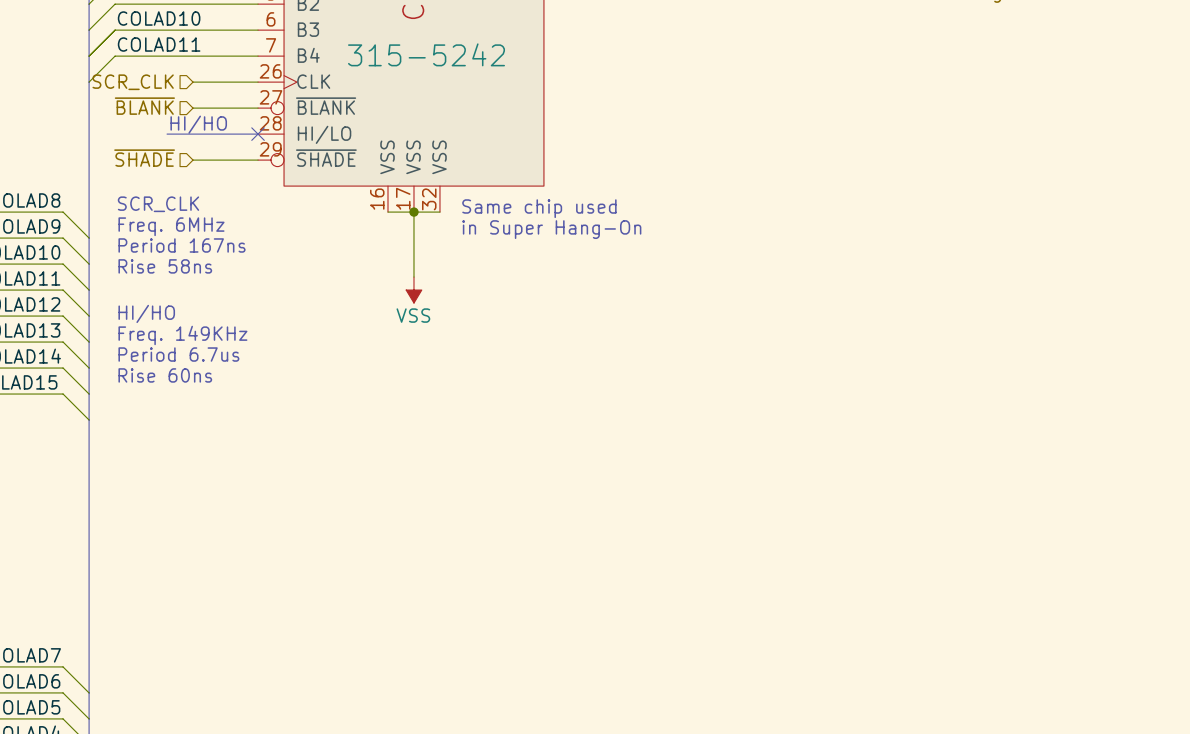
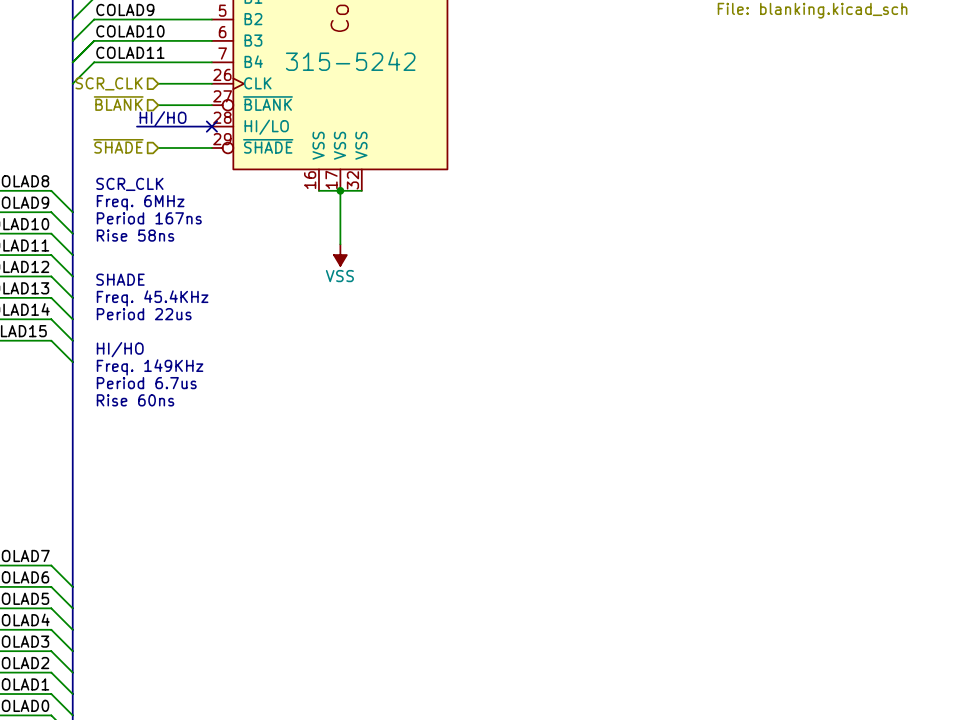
text: Same chip used (539, 208) -> none
text: in Super Hang-On (551, 229) -> none
text position: HI/HO (146, 313) -> HI/HO (120, 349)
text: none -> SHADE (120, 279)
text position: Freq. 149KHz (182, 335) -> Freq. 149KHz (150, 367)
text: none -> Freq. 45.4KHz (152, 298)
text position: Period 6.7us (178, 354) -> Period 6.7us (146, 383)
text: none -> Period 22us (144, 314)
text position: Rise 60ns (165, 375) -> Rise 60ns (135, 400)

